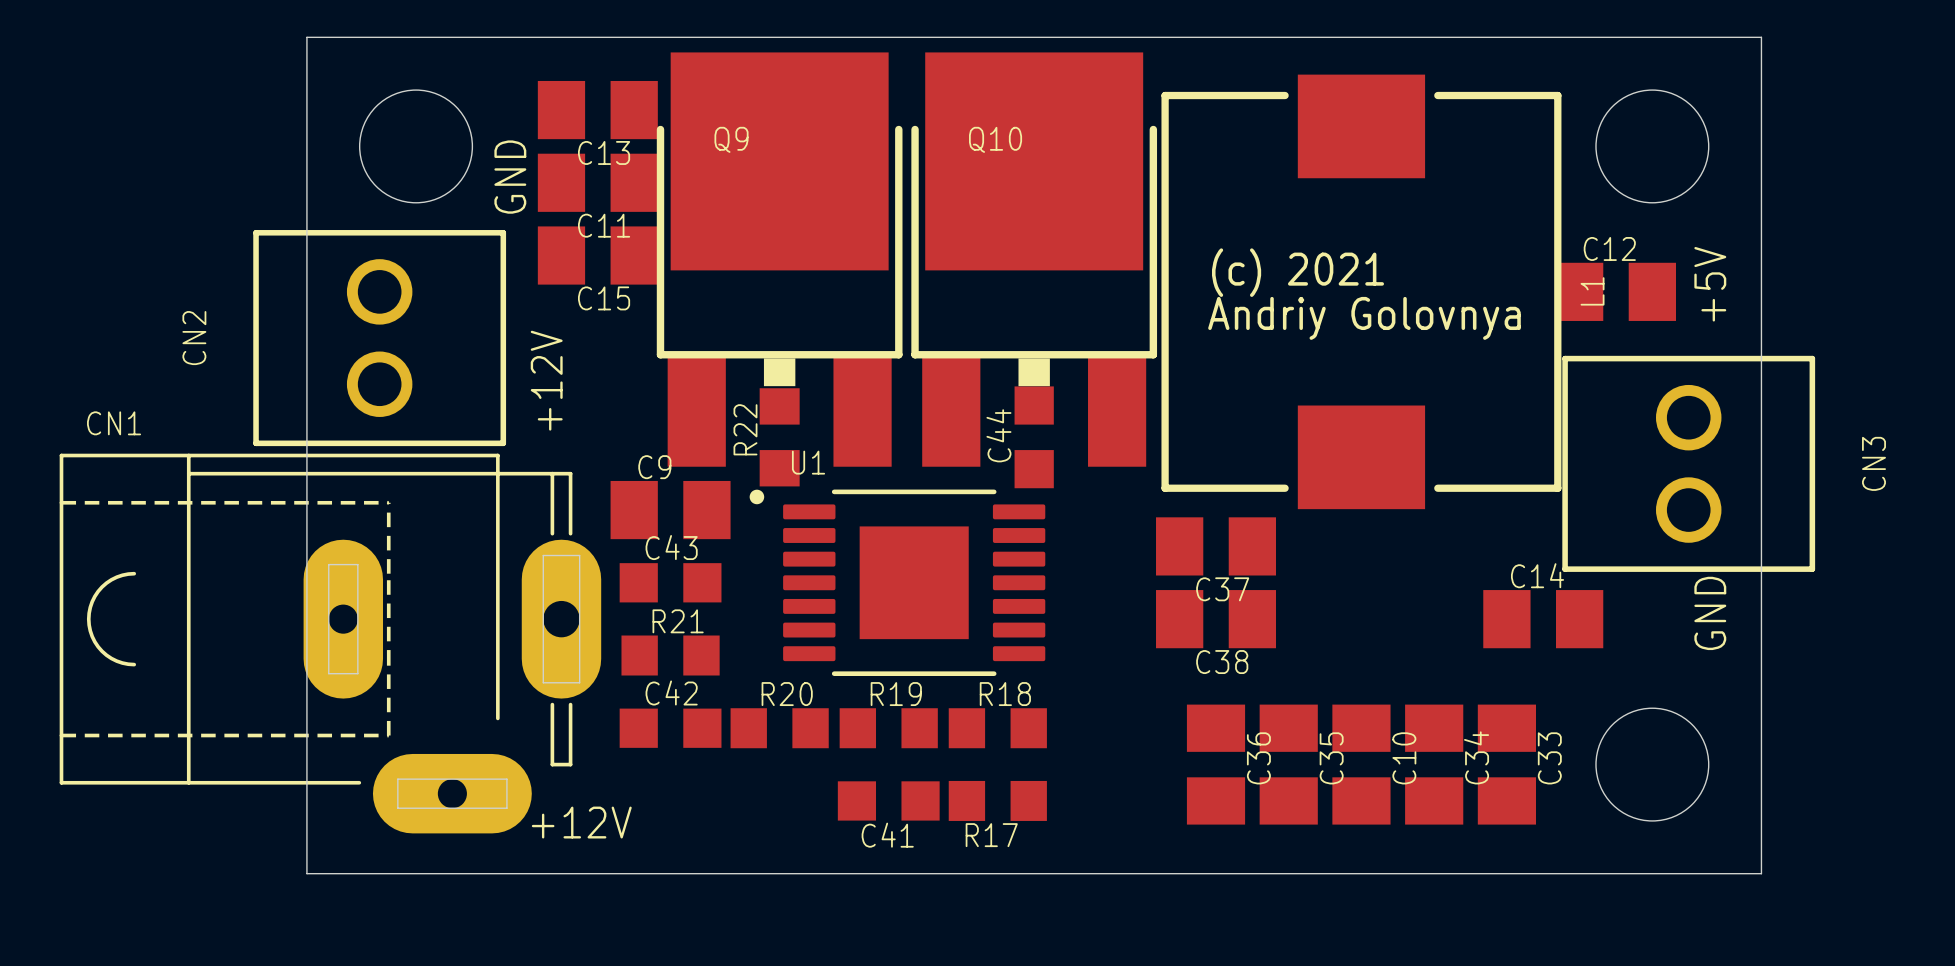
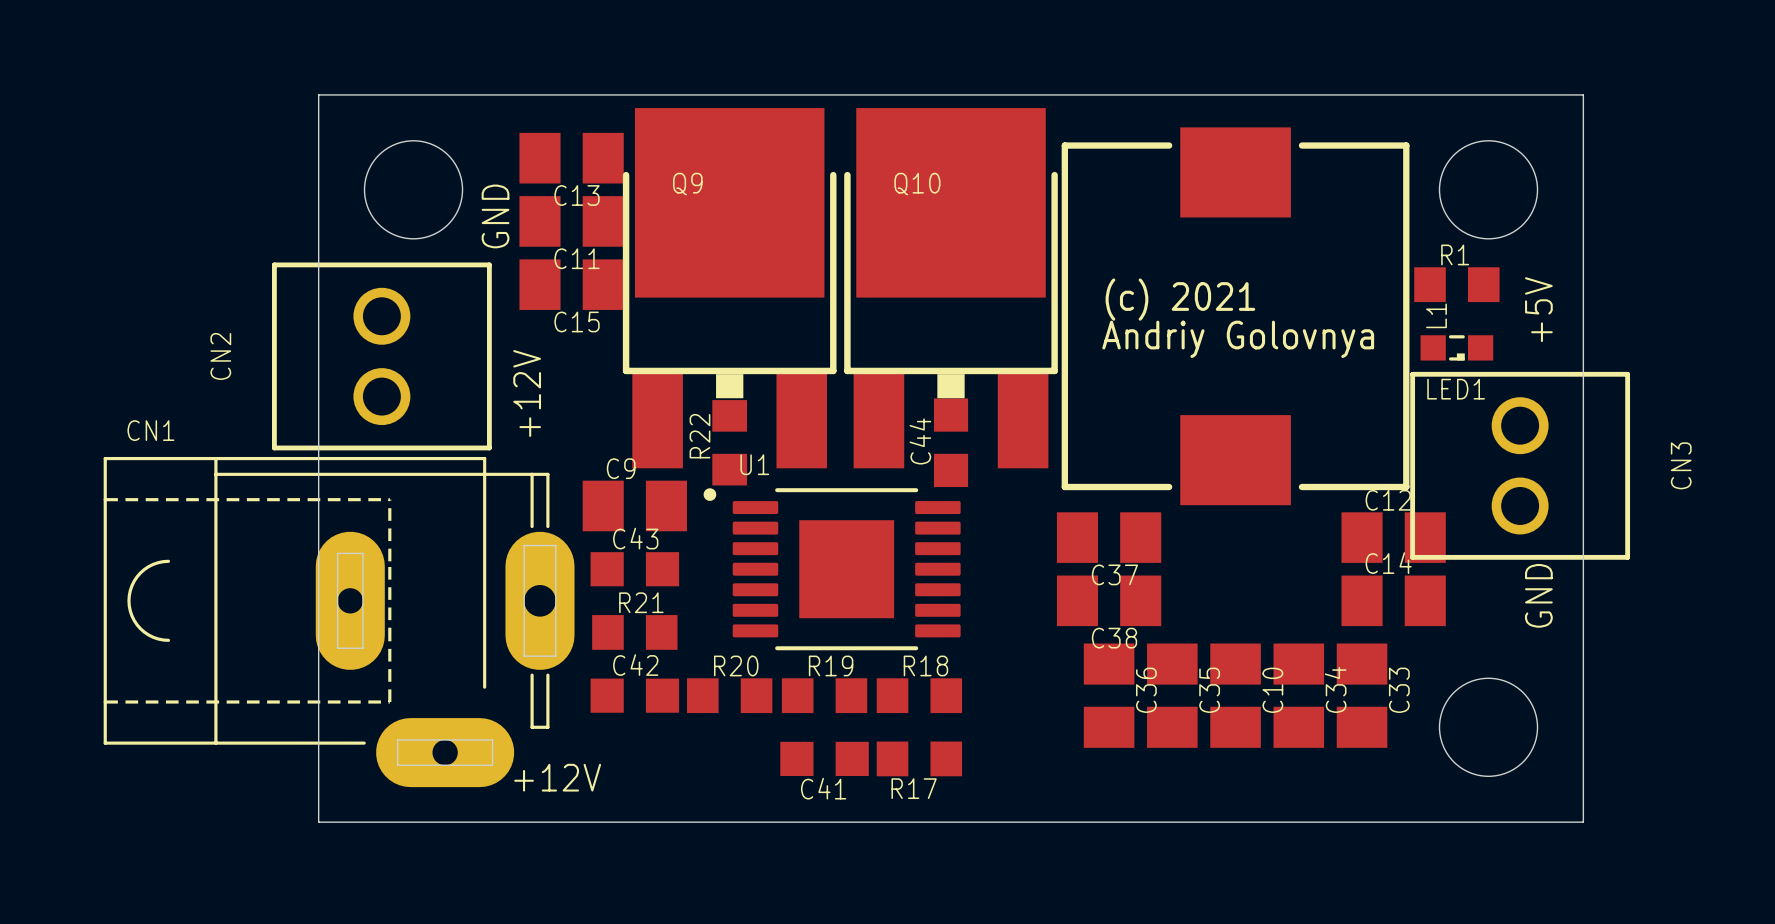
R1: none -> (1456, 284)
C12 position: (1615, 291) -> (1393, 537)
LED1: none -> (1456, 347)
C36 position: (1216, 764) -> (1109, 695)
C35 position: (1288, 764) -> (1172, 695)
C10 position: (1361, 764) -> (1235, 695)
C34 position: (1434, 764) -> (1298, 695)
C33 position: (1506, 764) -> (1362, 695)

